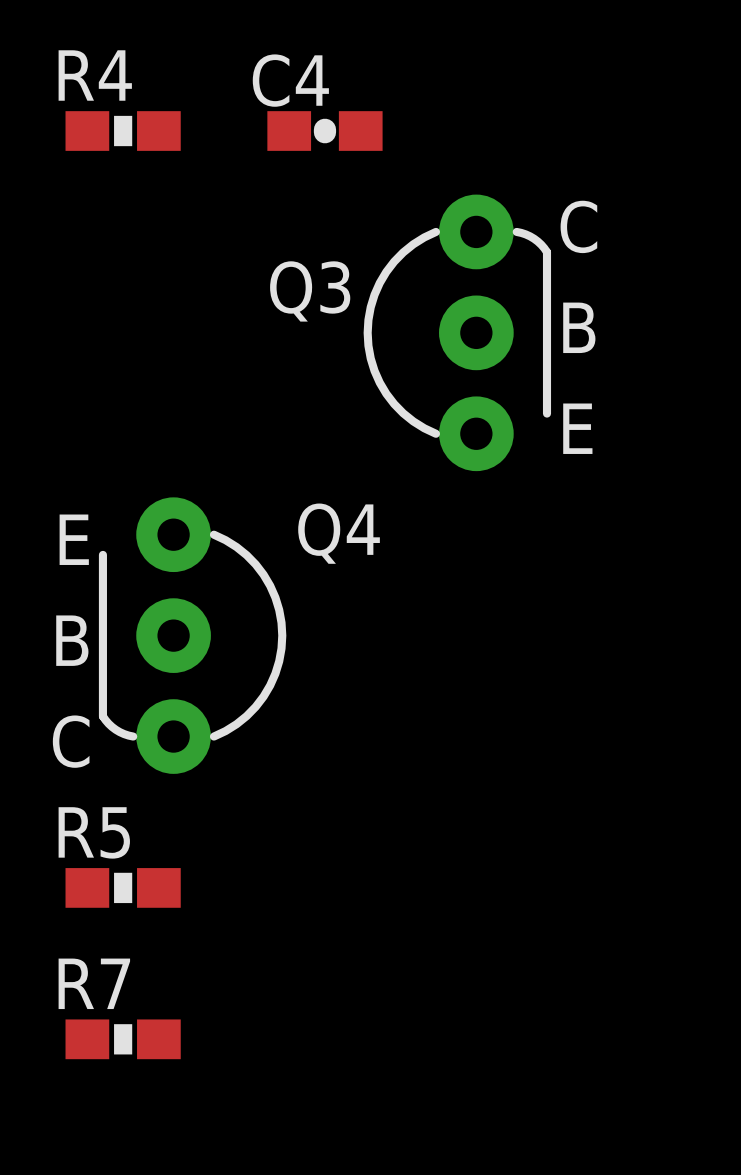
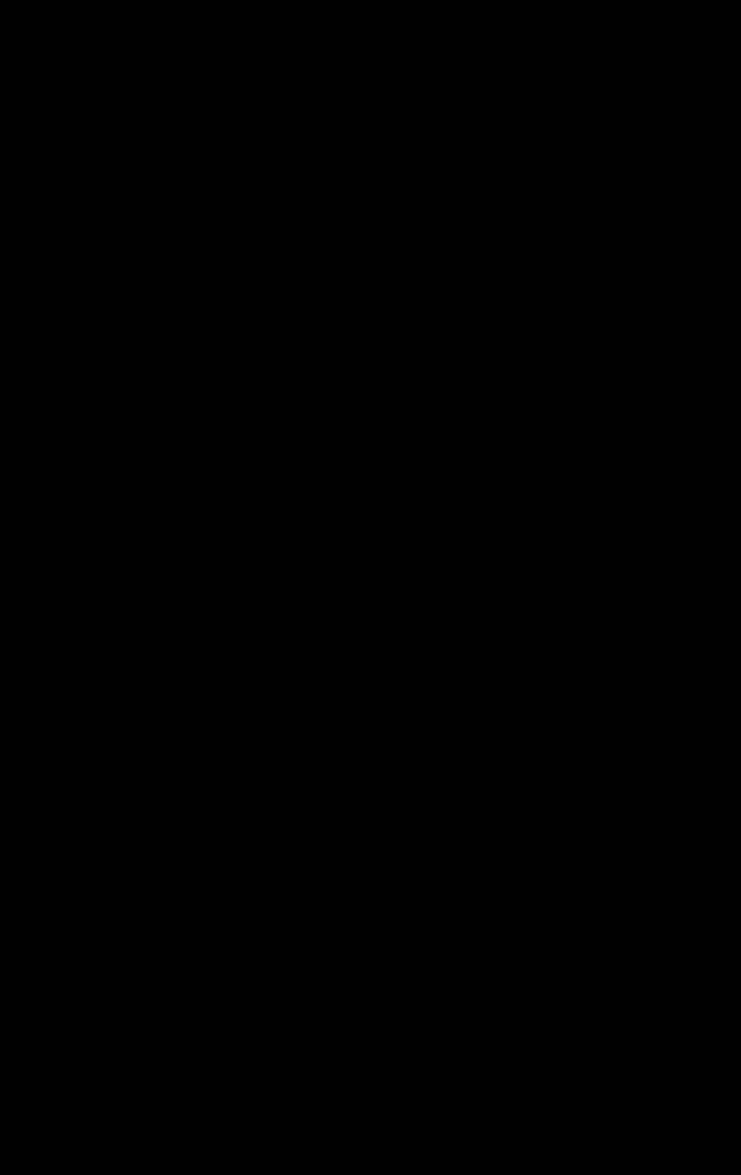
R4: (123, 131) -> none
C4: (324, 131) -> none
Q3: (457, 332) -> none
Q4: (192, 635) -> none
R5: (123, 887) -> none
R7: (123, 1039) -> none

